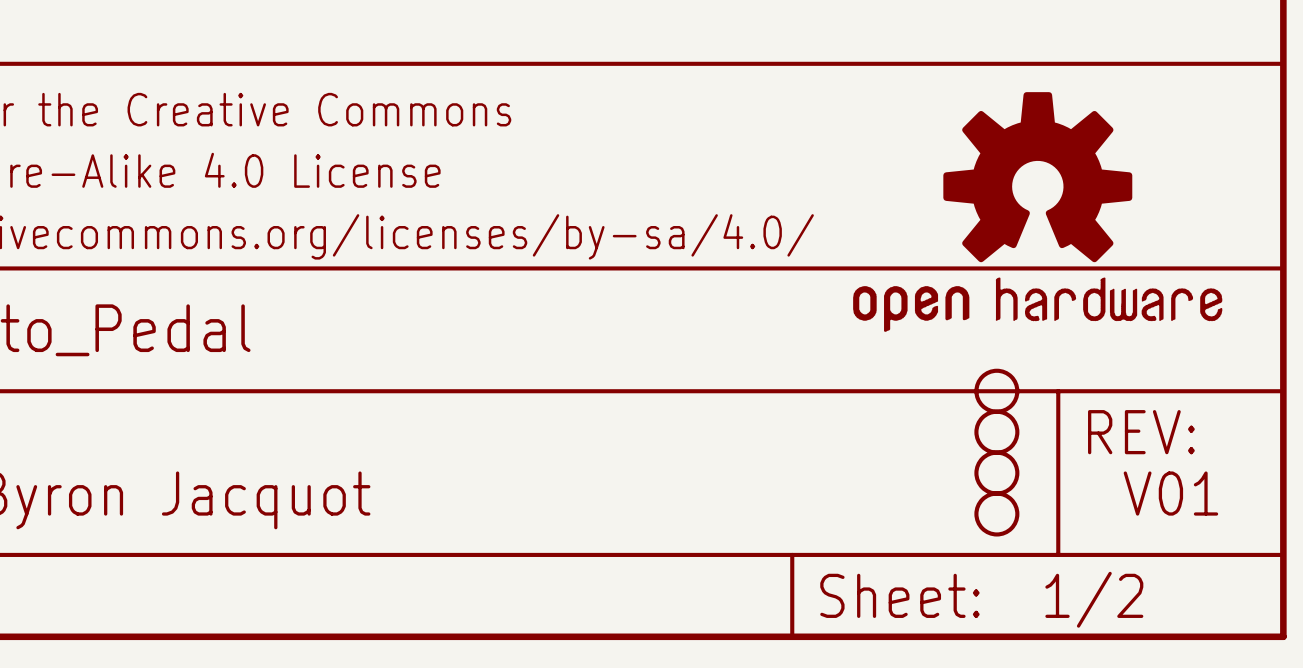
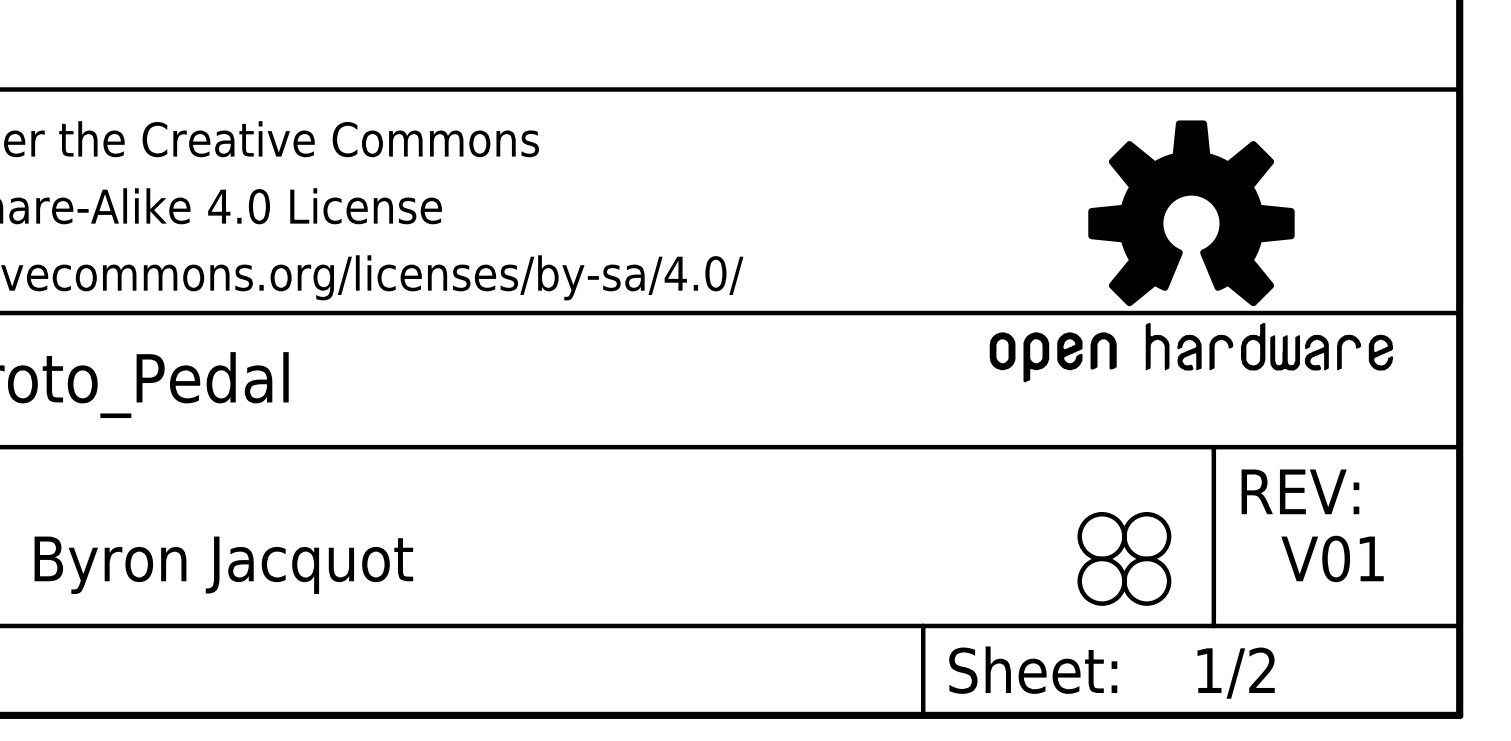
part: (996, 391) -> none
part: (996, 432) -> none
part: none -> (1102, 536)
part: none -> (1102, 581)

